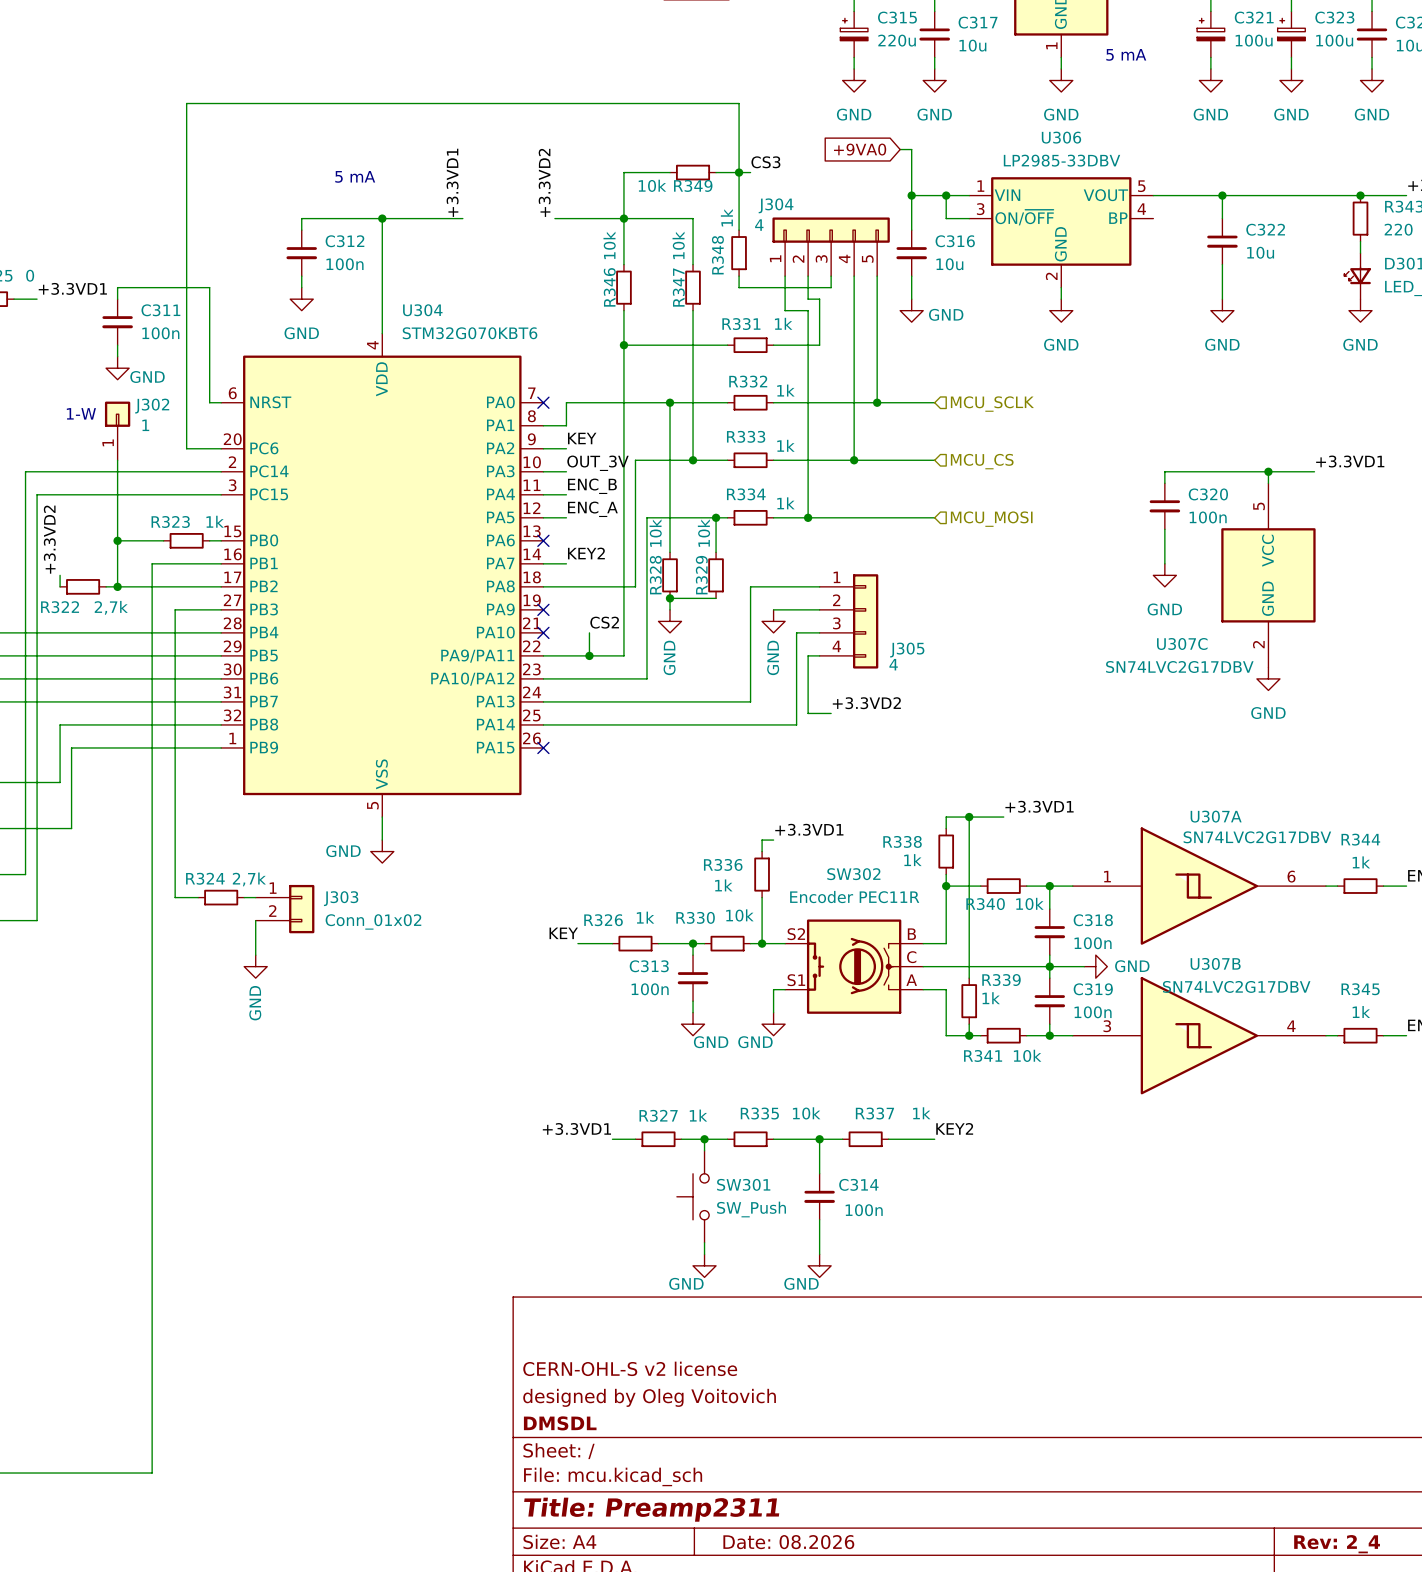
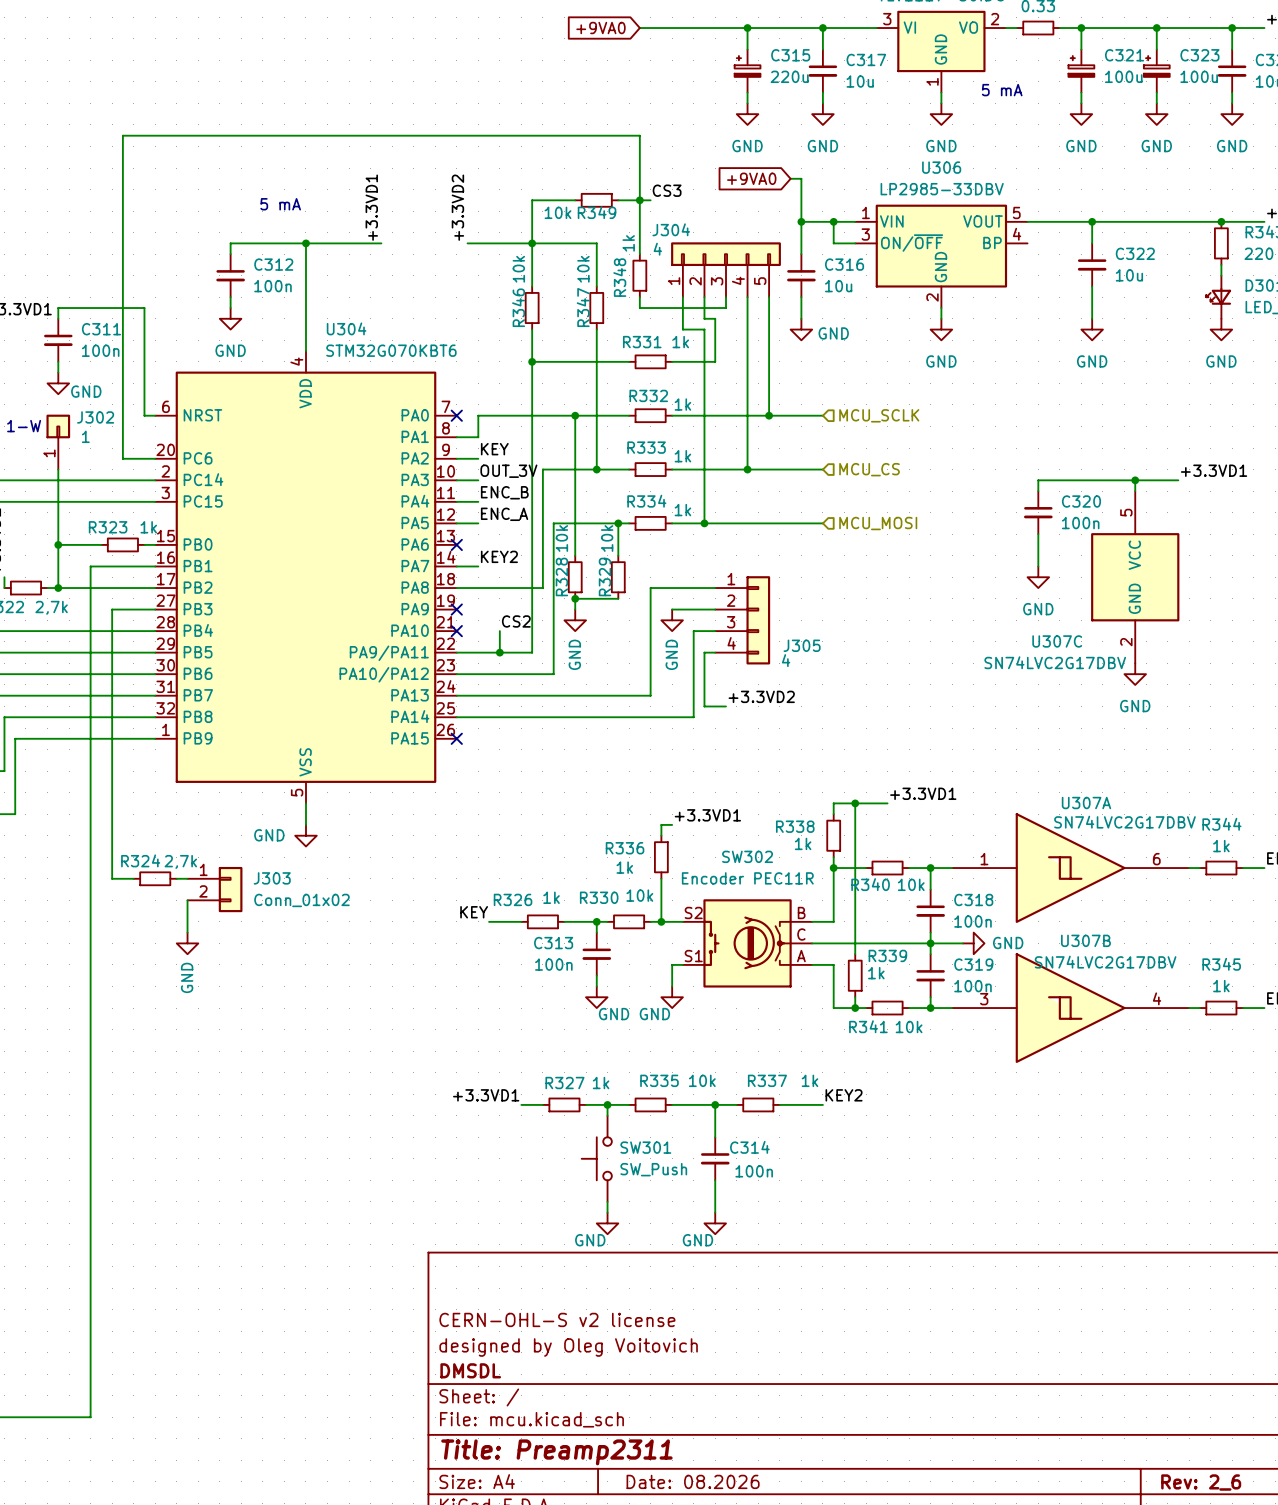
title block: Rev: 2_4 (1337, 1544) -> Rev: 2_6 (1201, 1482)

